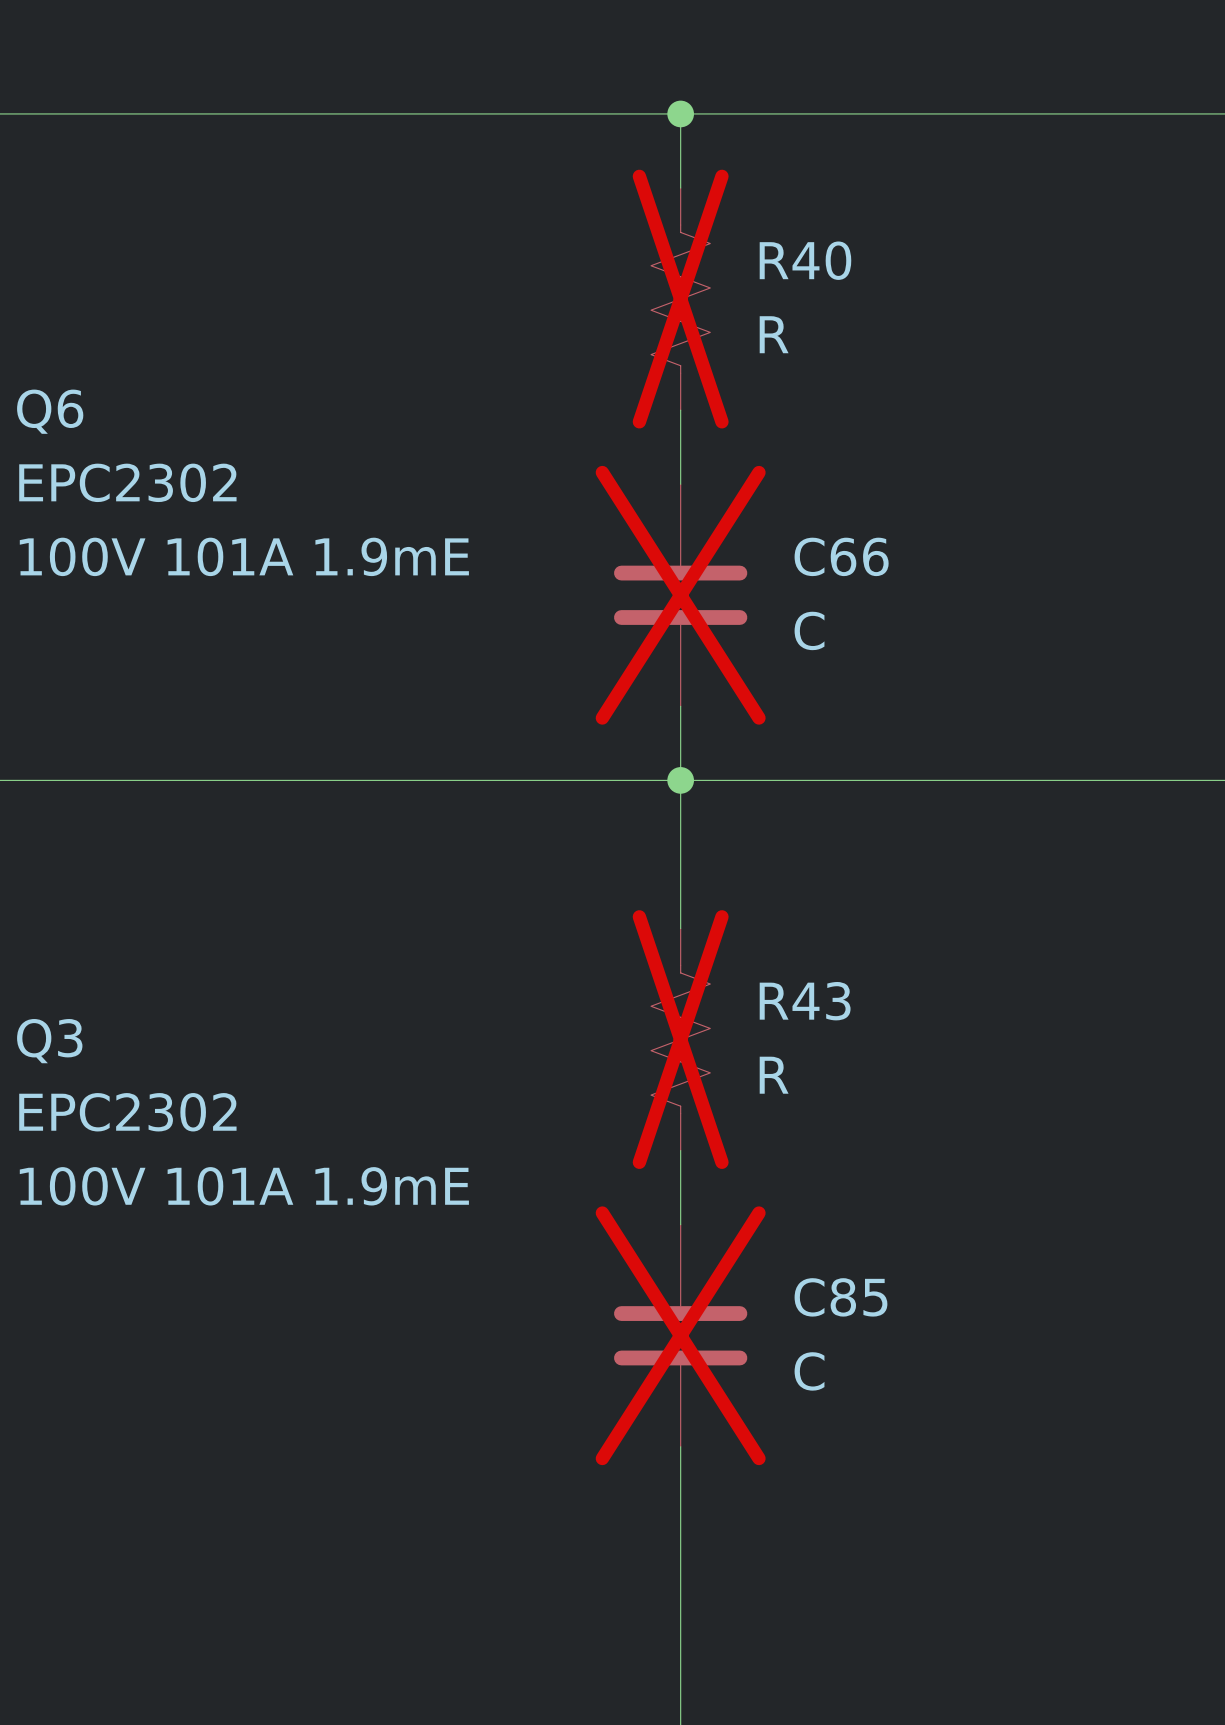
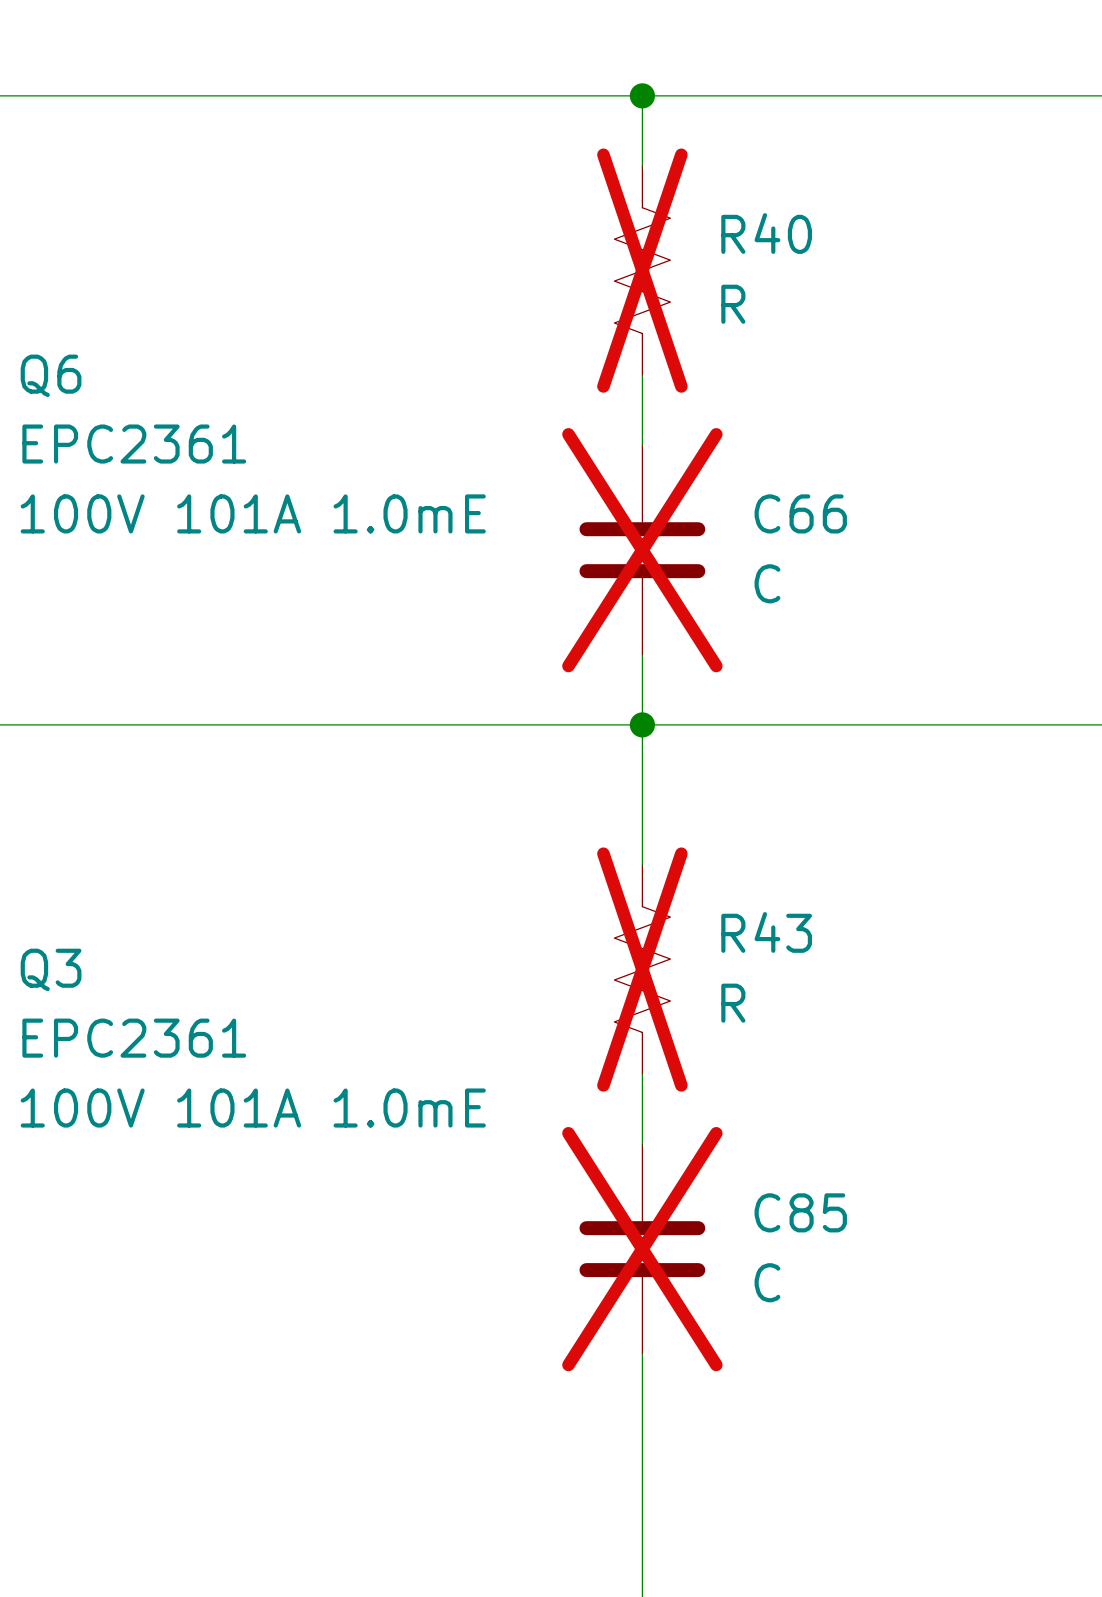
Q6 value: EPC2302 (127, 482) -> EPC2361 (134, 444)
Q6 text: 100V 101A 1.9mE (244, 556) -> 100V 101A 1.0mE (253, 513)
Q3 value: EPC2302 (127, 1112) -> EPC2361 (134, 1038)
Q3 text: 100V 101A 1.9mE (244, 1186) -> 100V 101A 1.0mE (253, 1108)

